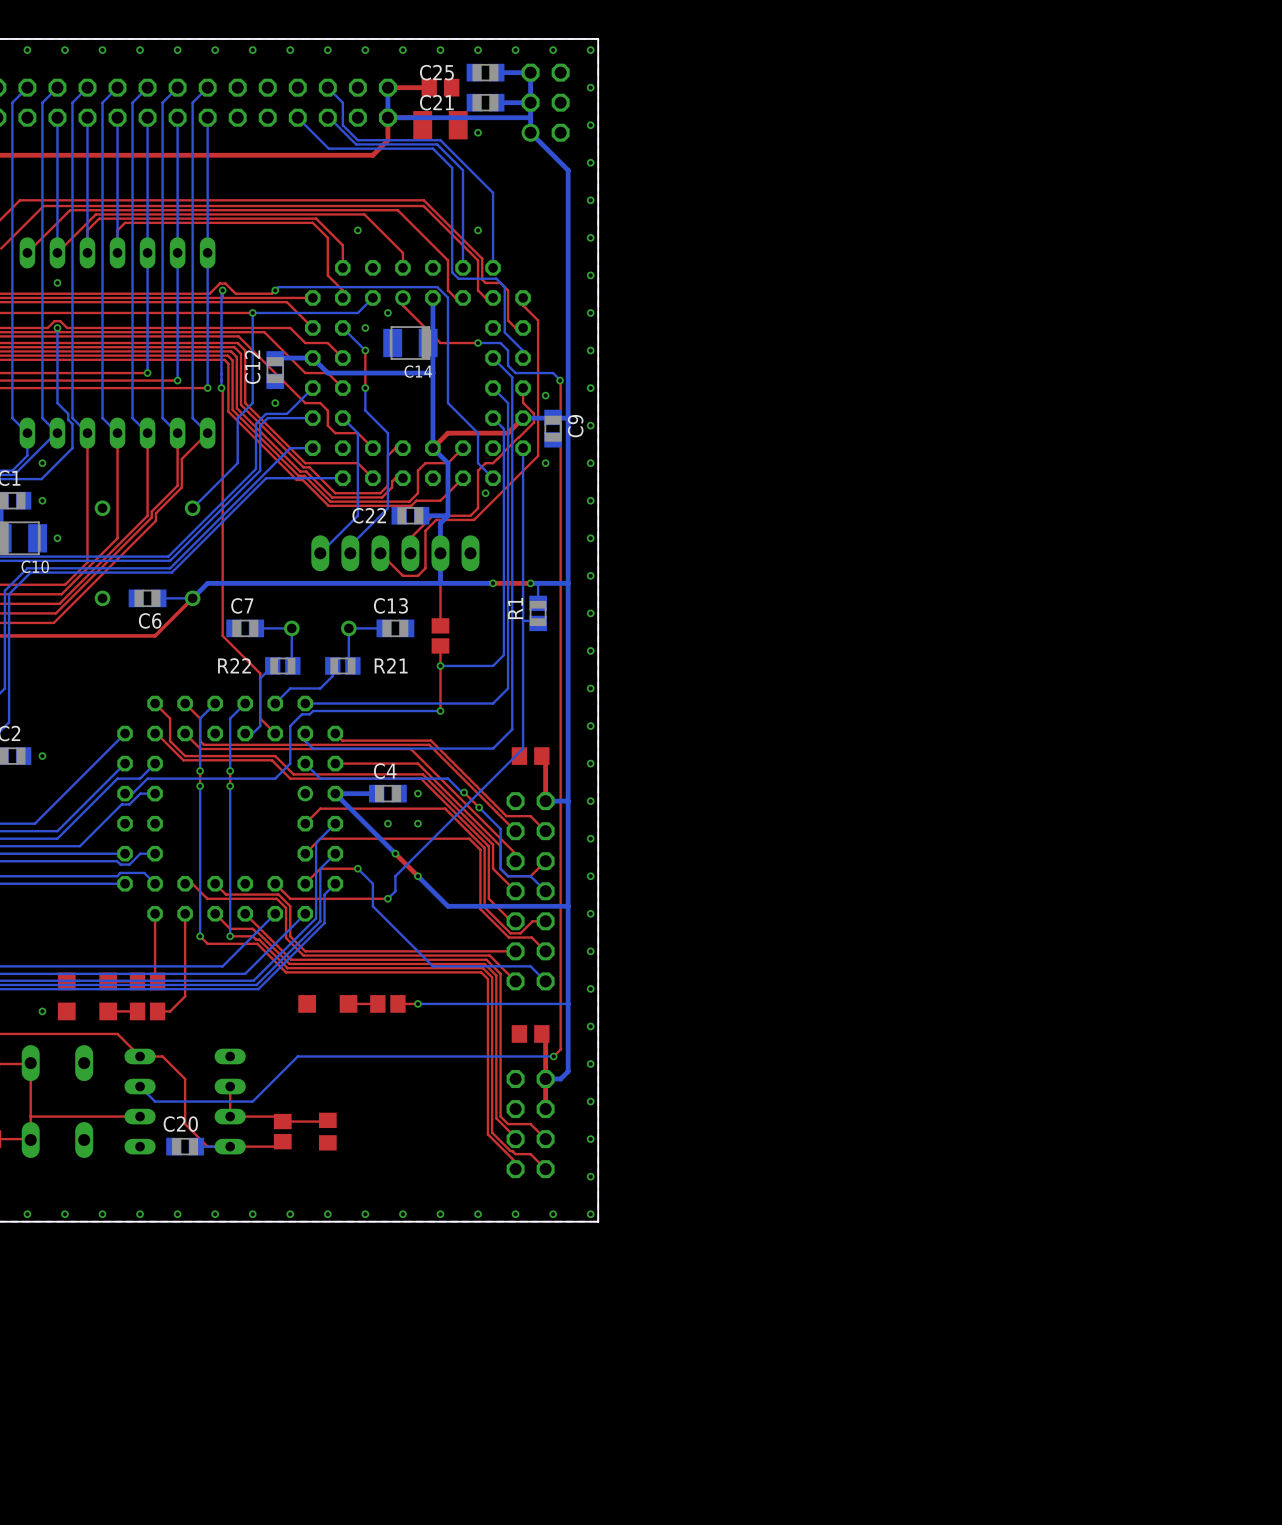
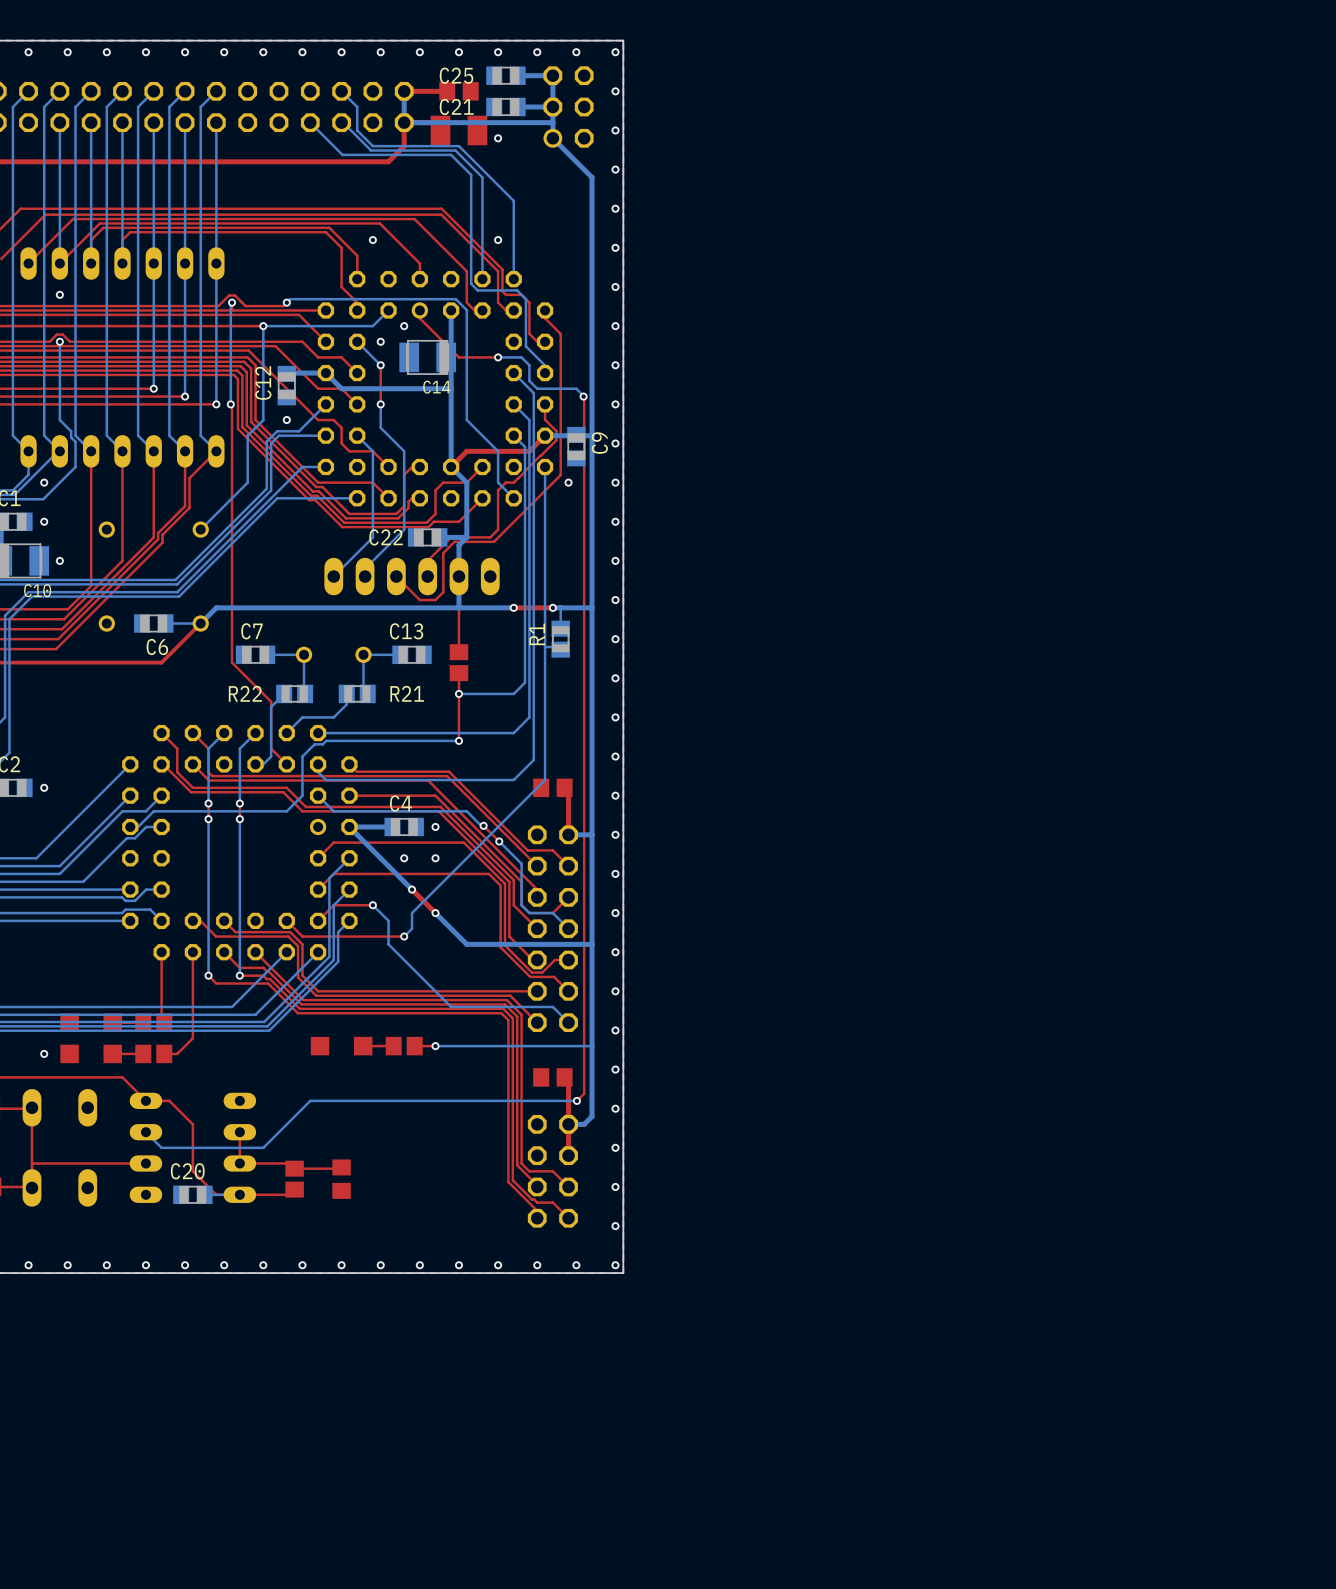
via: (545, 395) -> none
via: (485, 493) -> none

